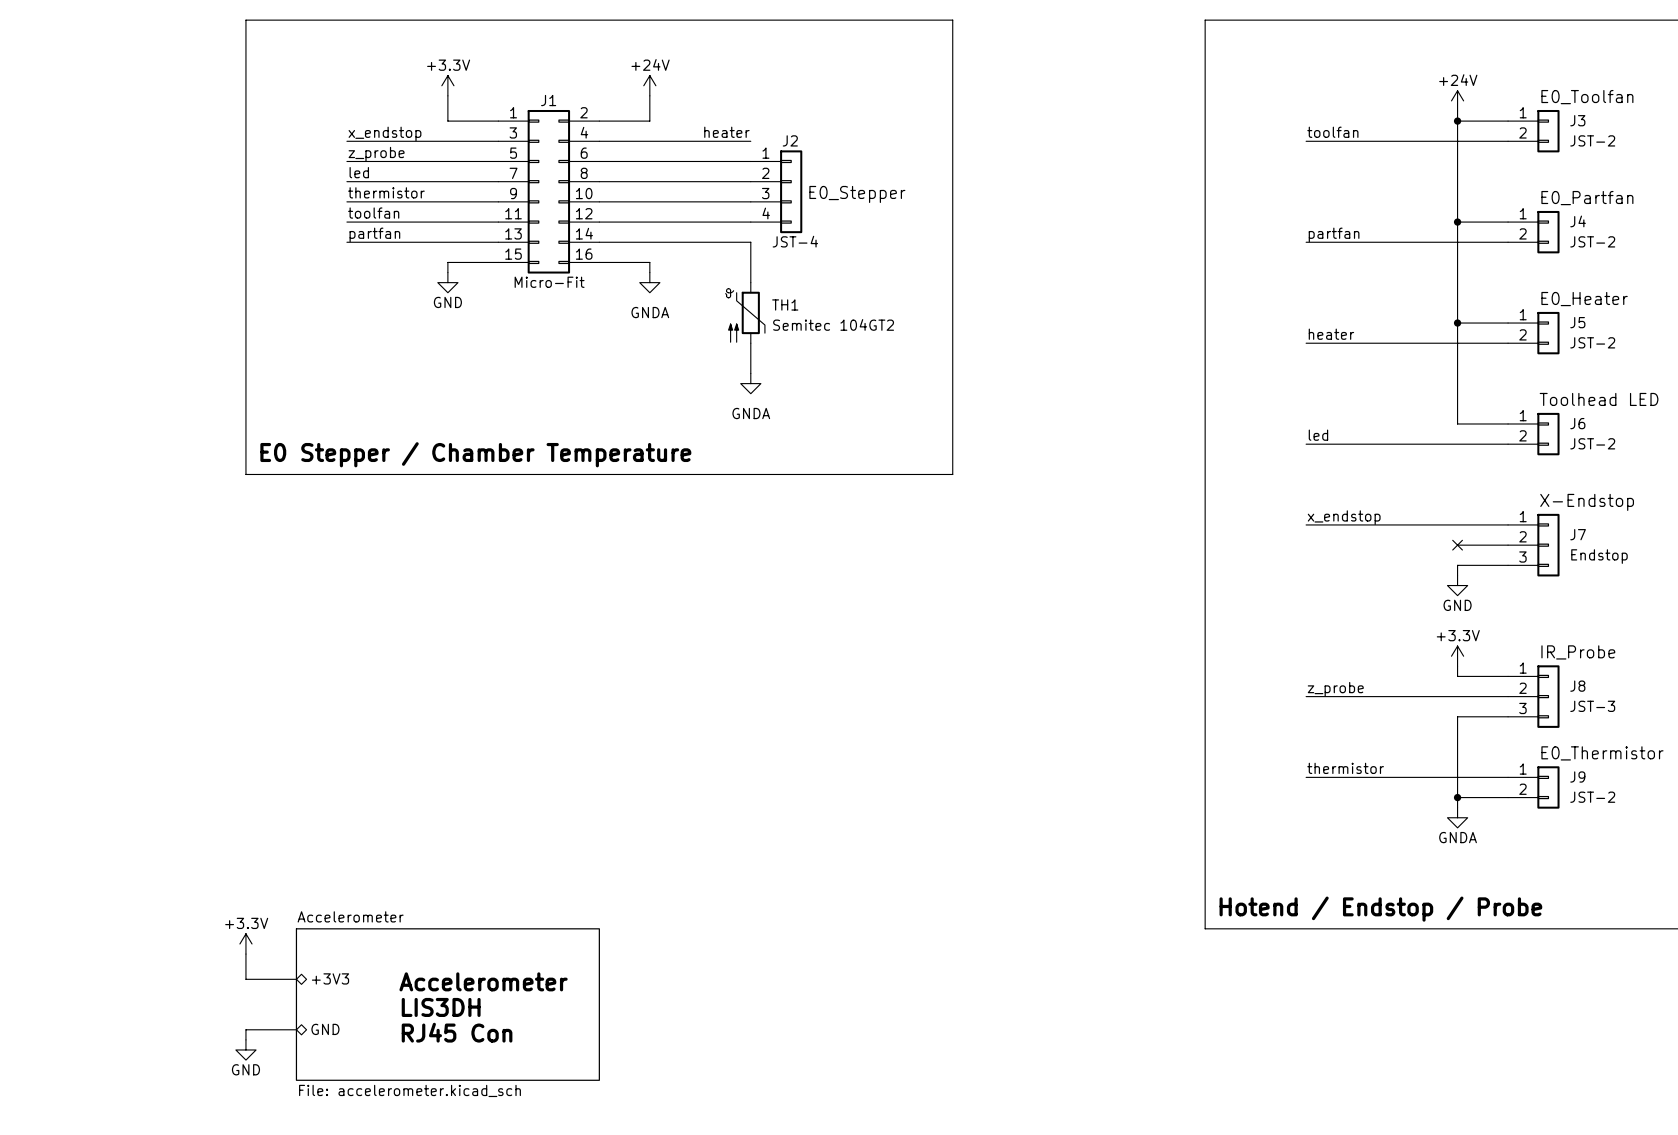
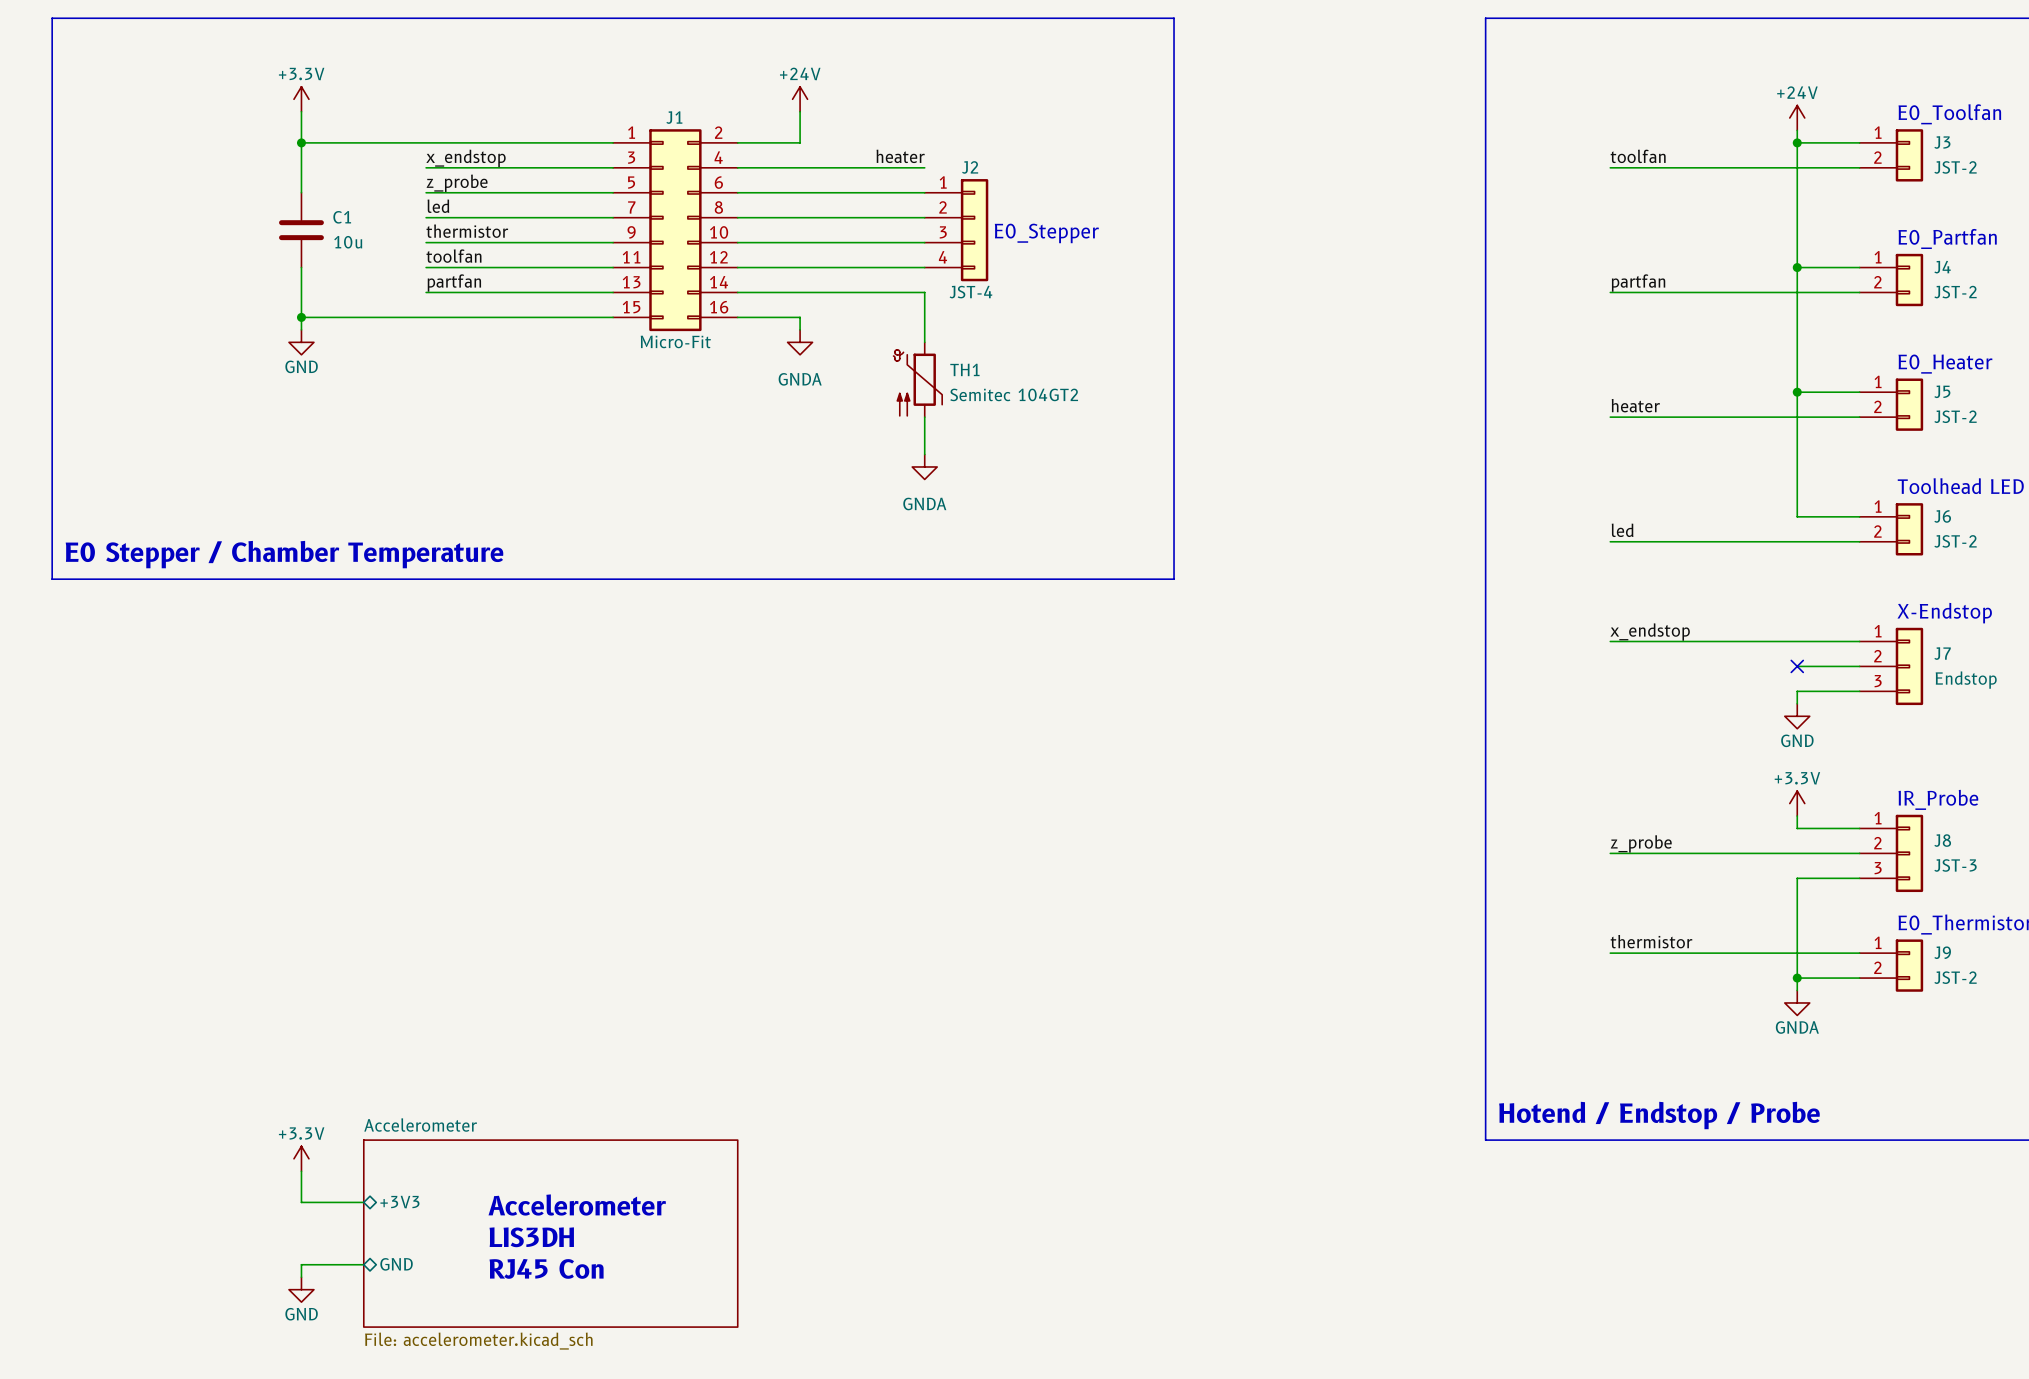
line: (245, 20) (245, 474) -> (301, 18) (52, 18) (52, 579) (301, 579)
power symbol: none -> +3.3V (301, 99)
power symbol: +3.3V (447, 85) -> none
wire: (447, 95) (447, 121) -> (301, 142) (550, 142)
junction: none -> (301, 142)
C1: none -> 10u (301, 230)
junction: none -> (301, 317)
wire: (447, 262) (447, 272) -> (550, 317) (301, 317)
power symbol: none -> GND (301, 342)
power symbol: GND (447, 282) -> none
text: none -> E0 Stepper / Chamber Temperature (284, 554)
text: E0 Stepper / Chamber Temperature (475, 454) -> none

